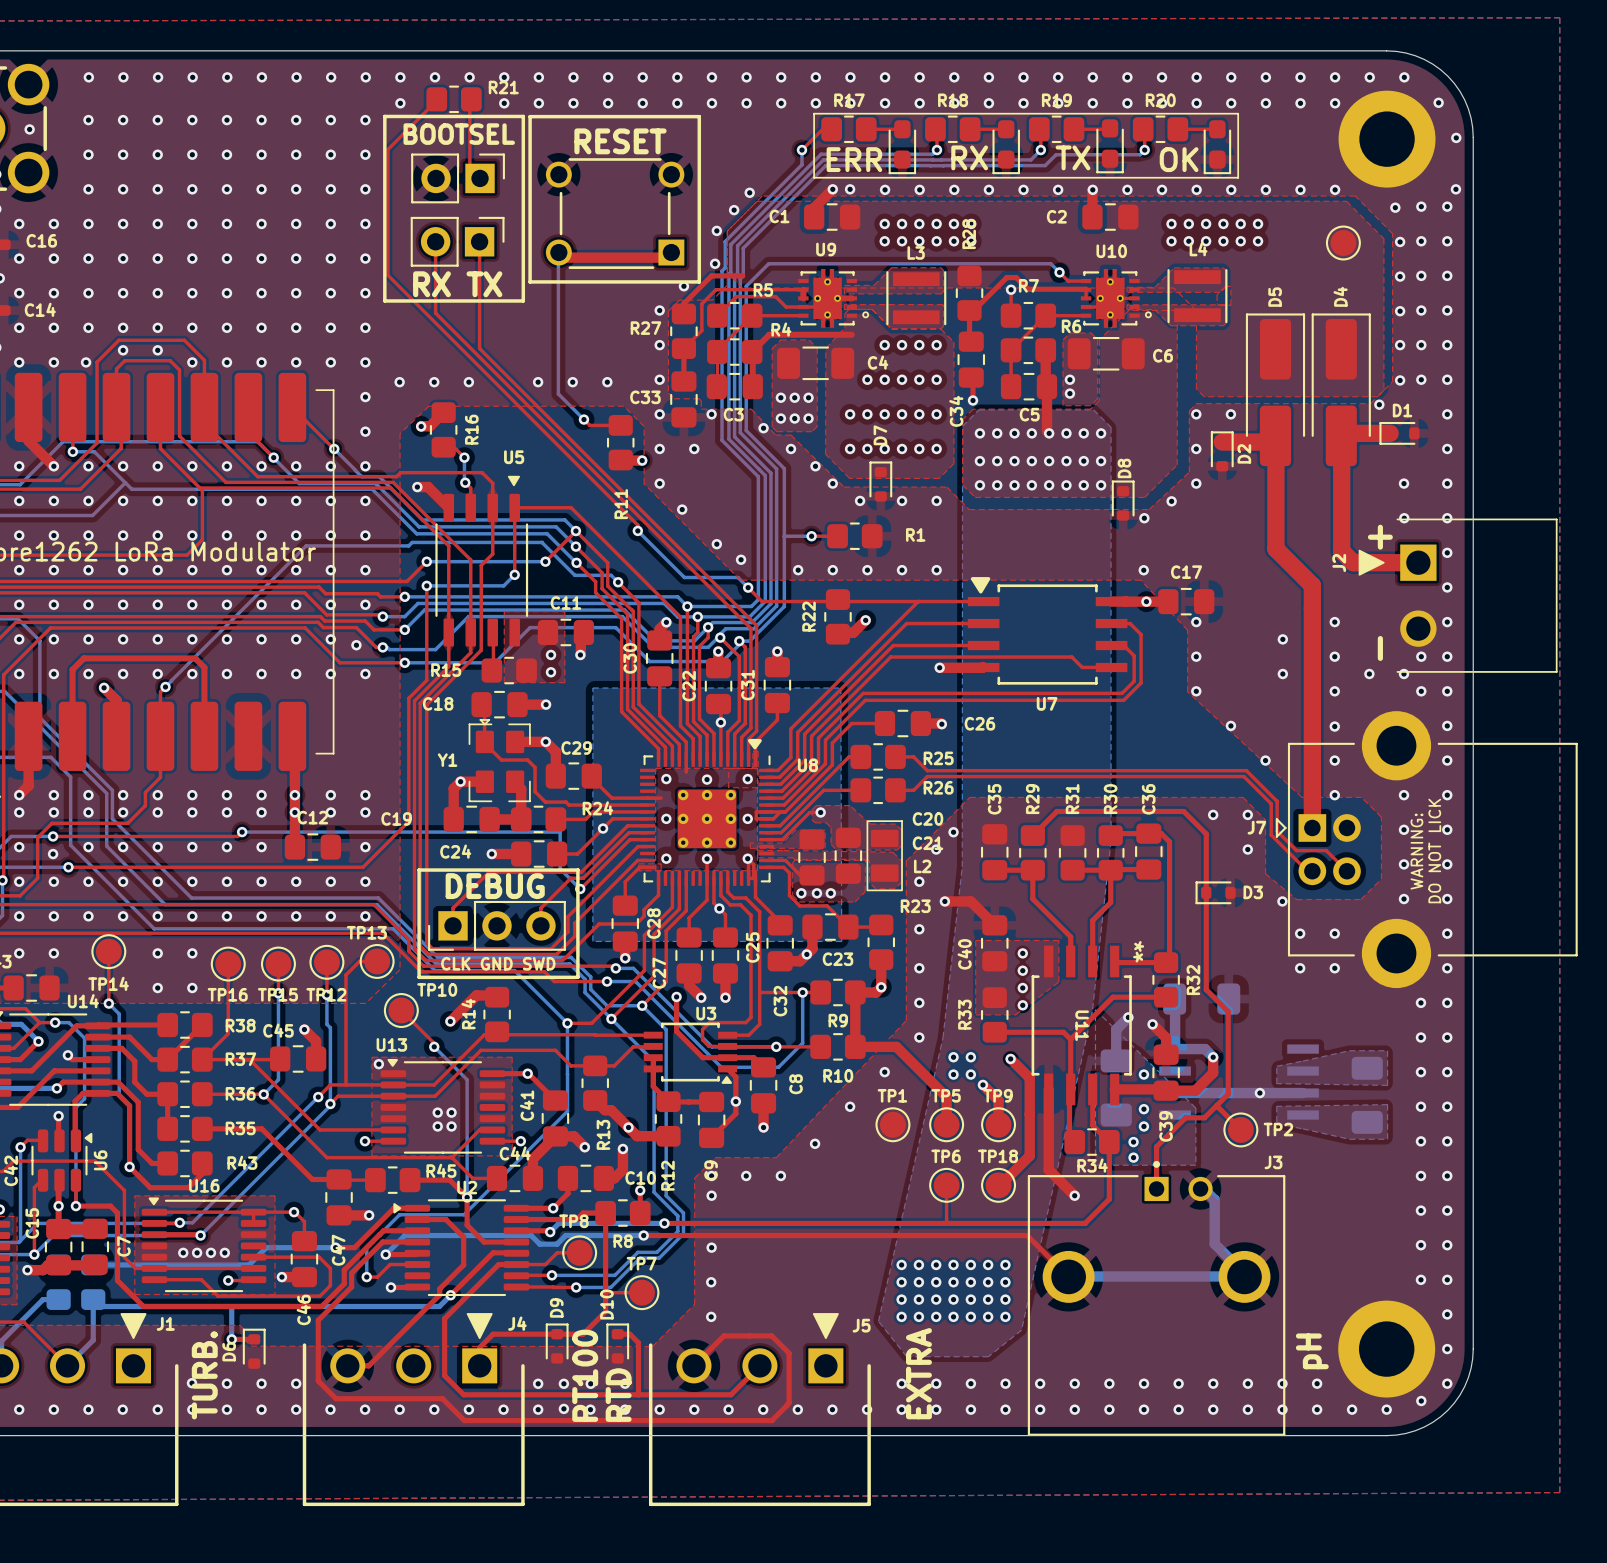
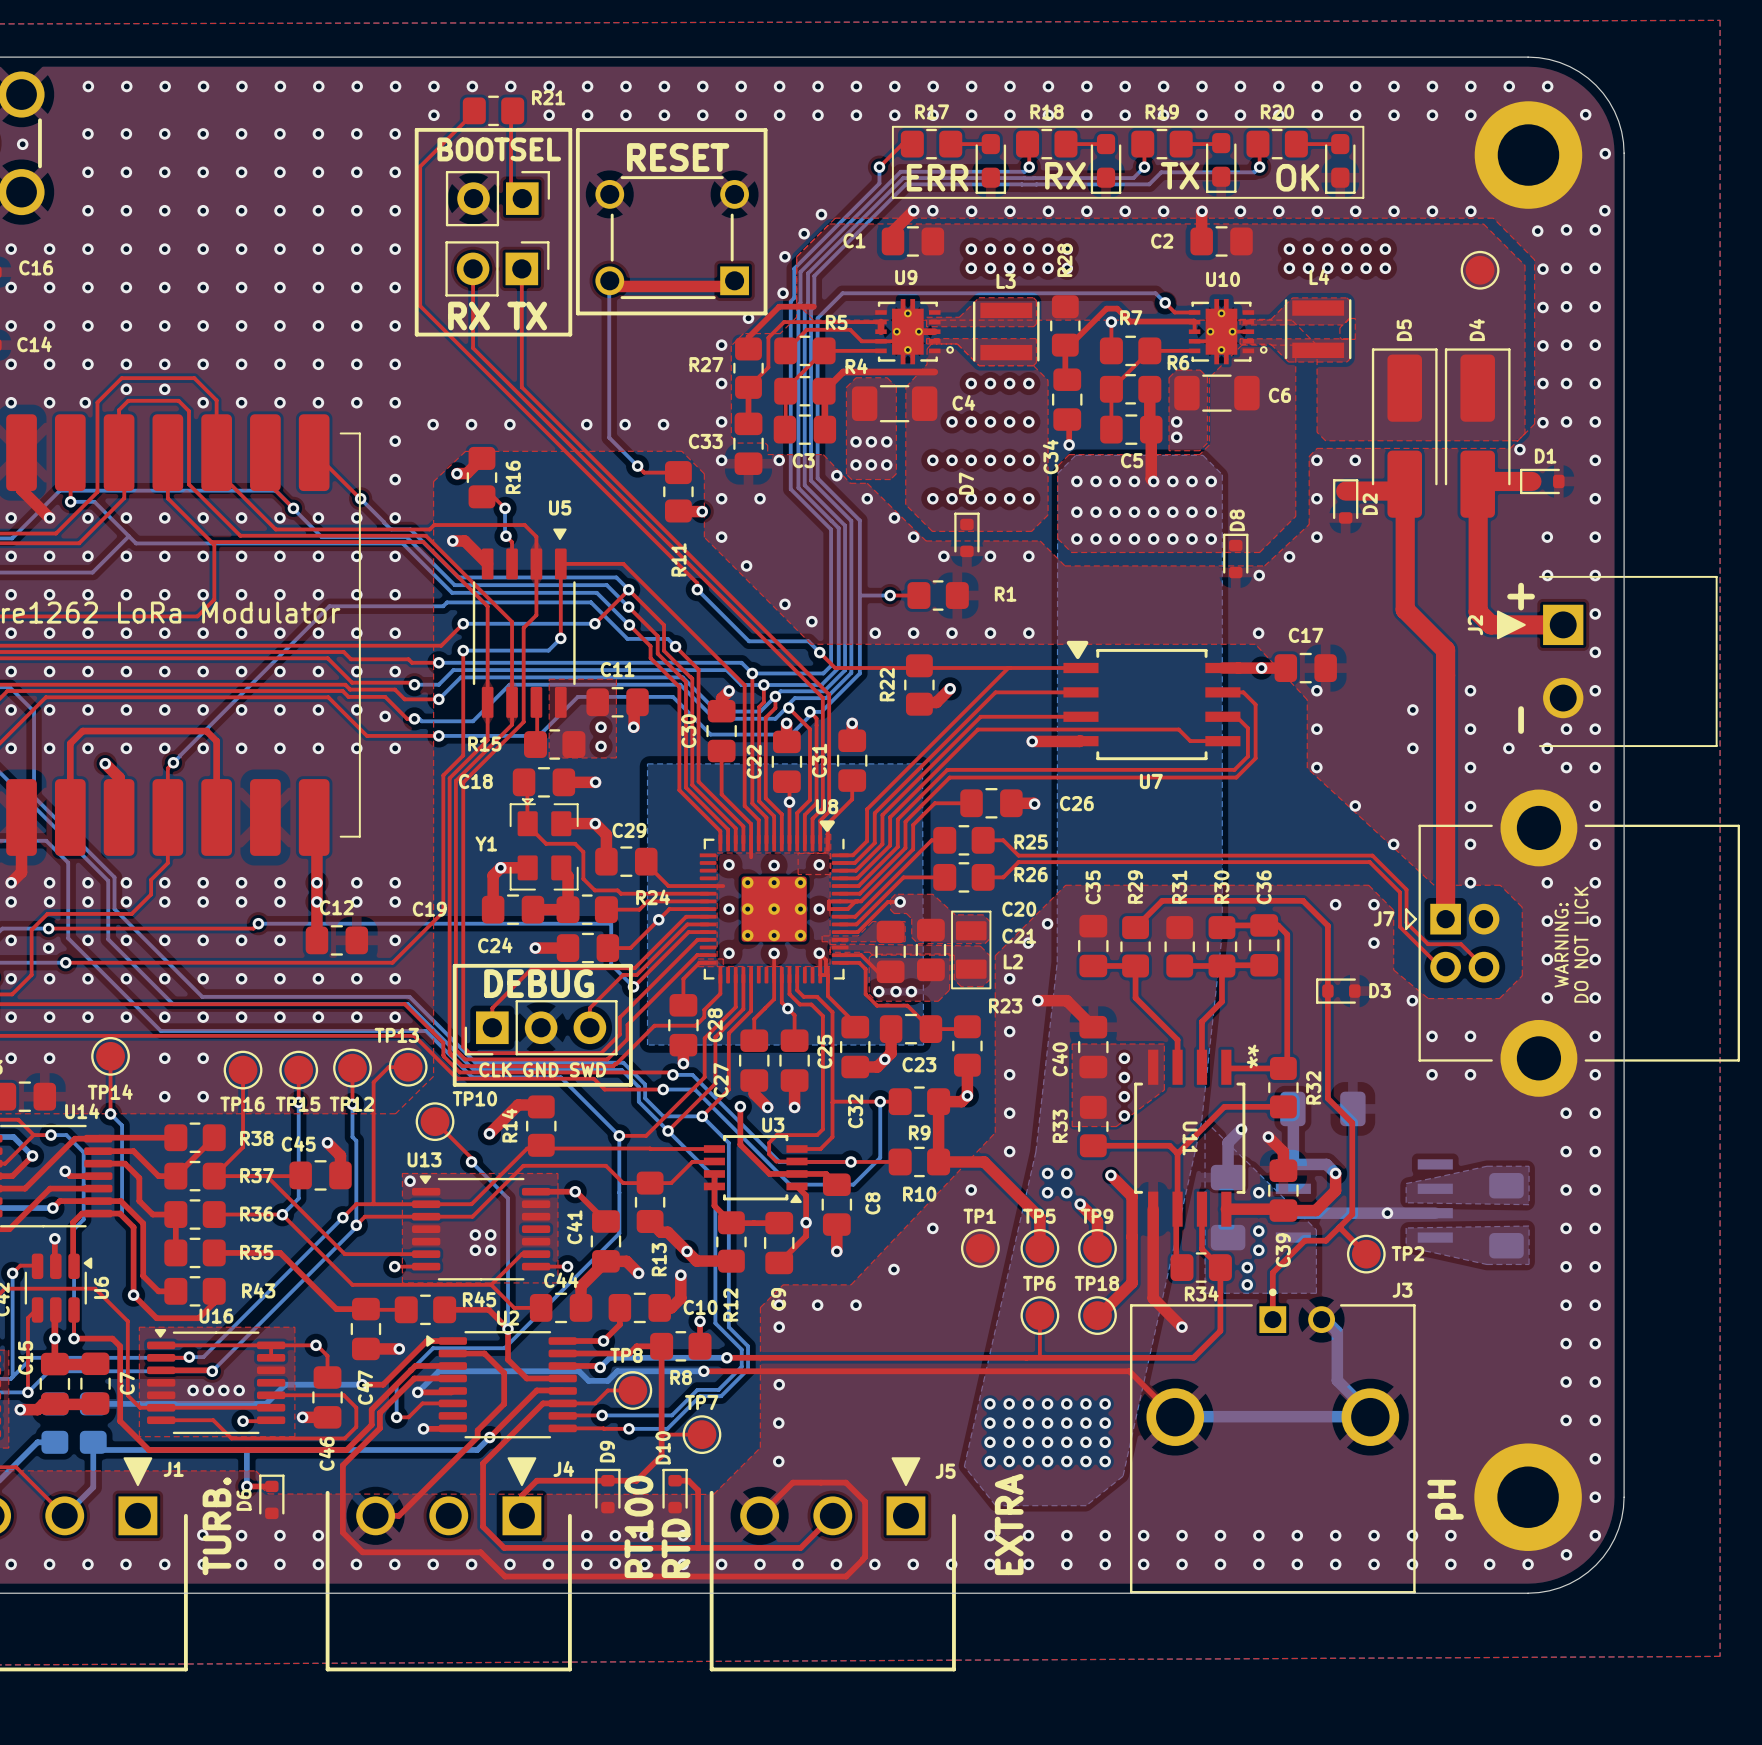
U8 name position: U8 (807, 765) -> U8 (827, 806)

